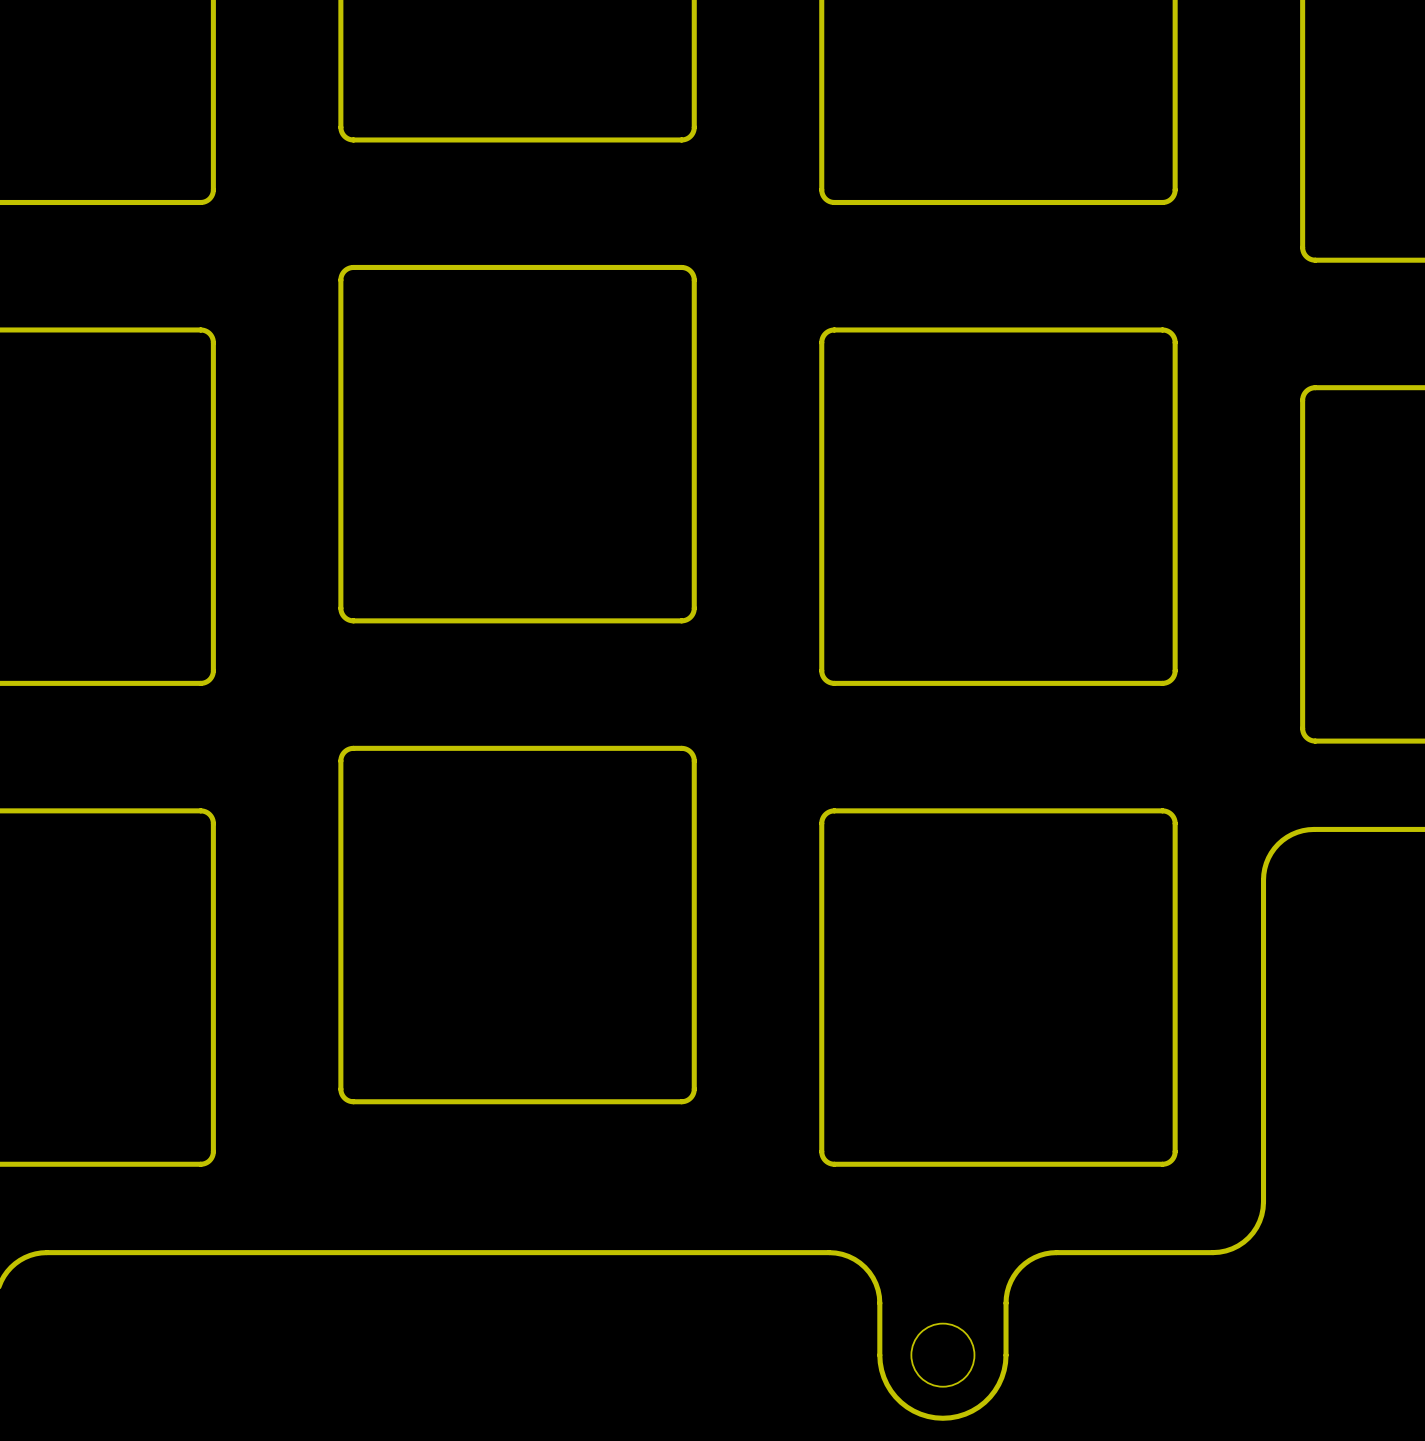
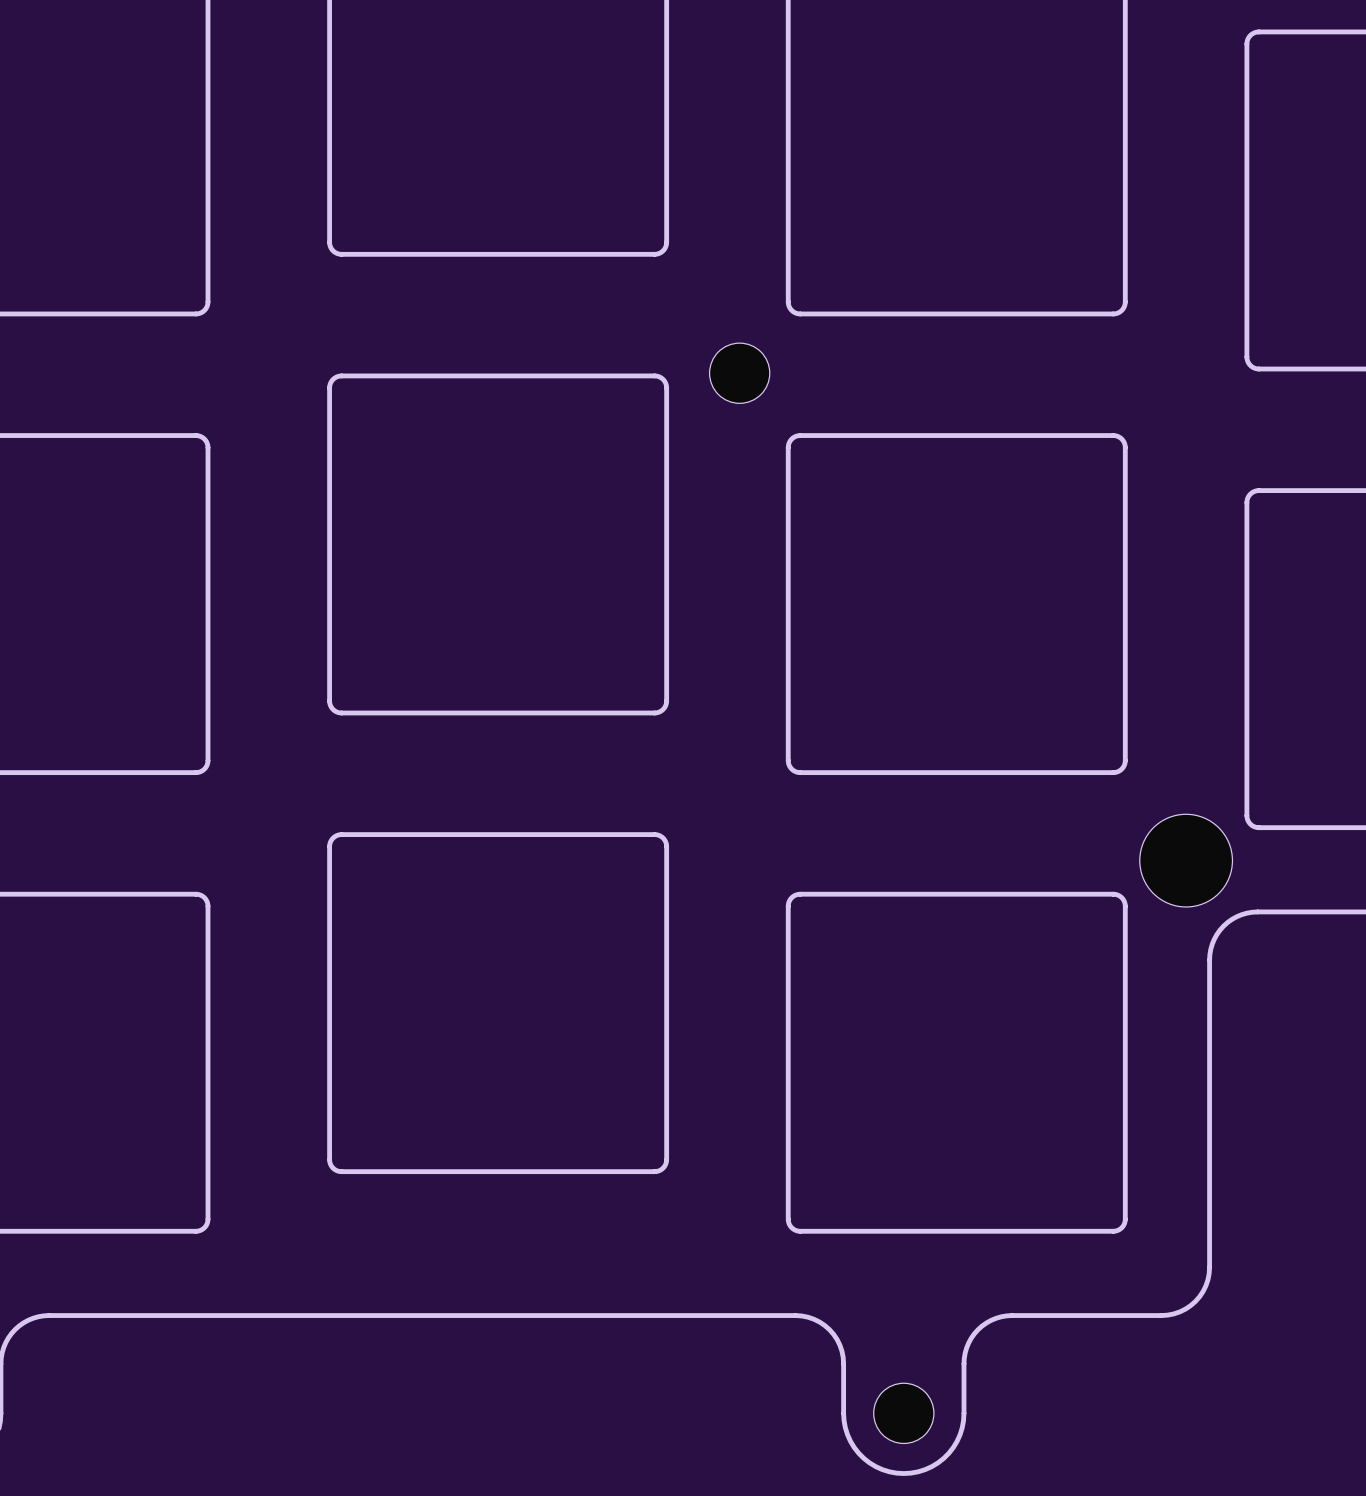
part: none -> (739, 373)
part: none -> (1186, 860)

